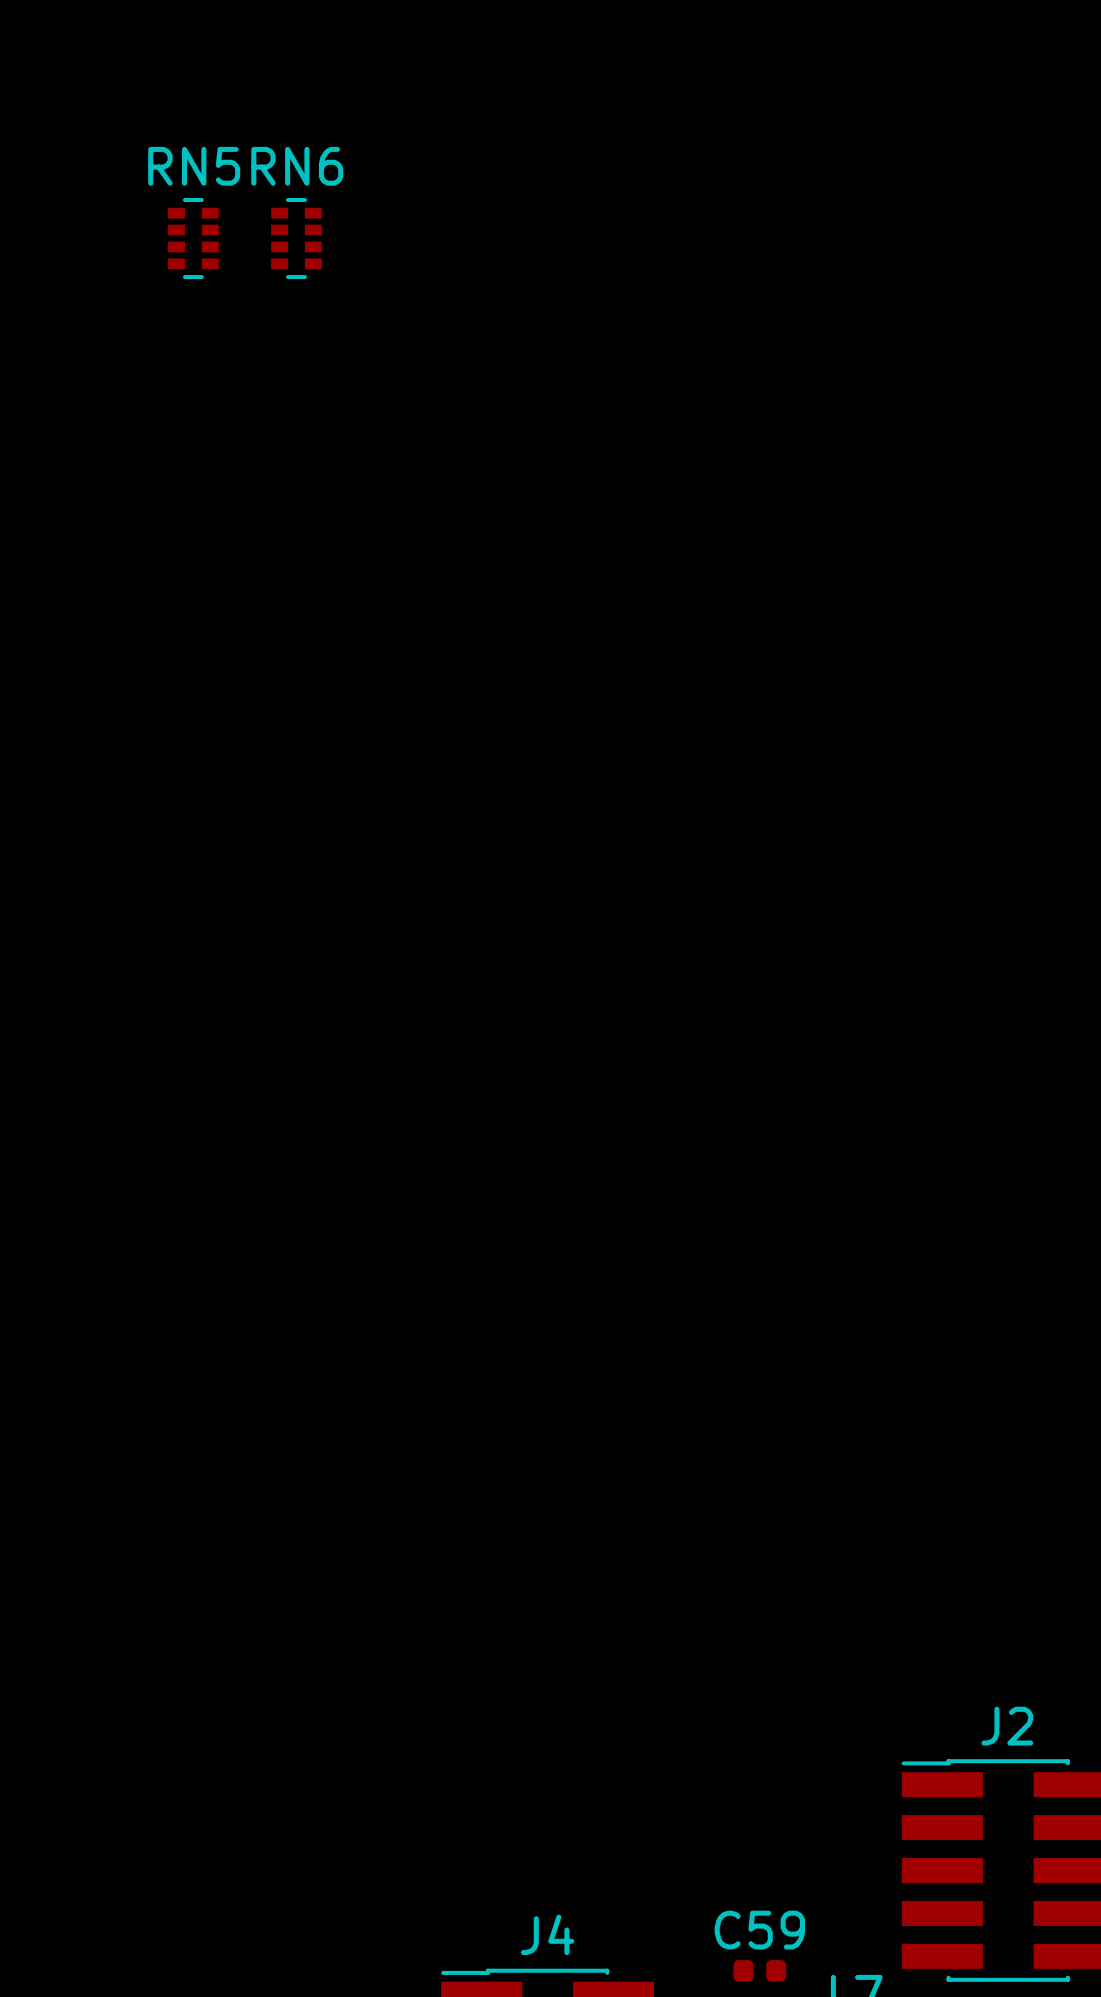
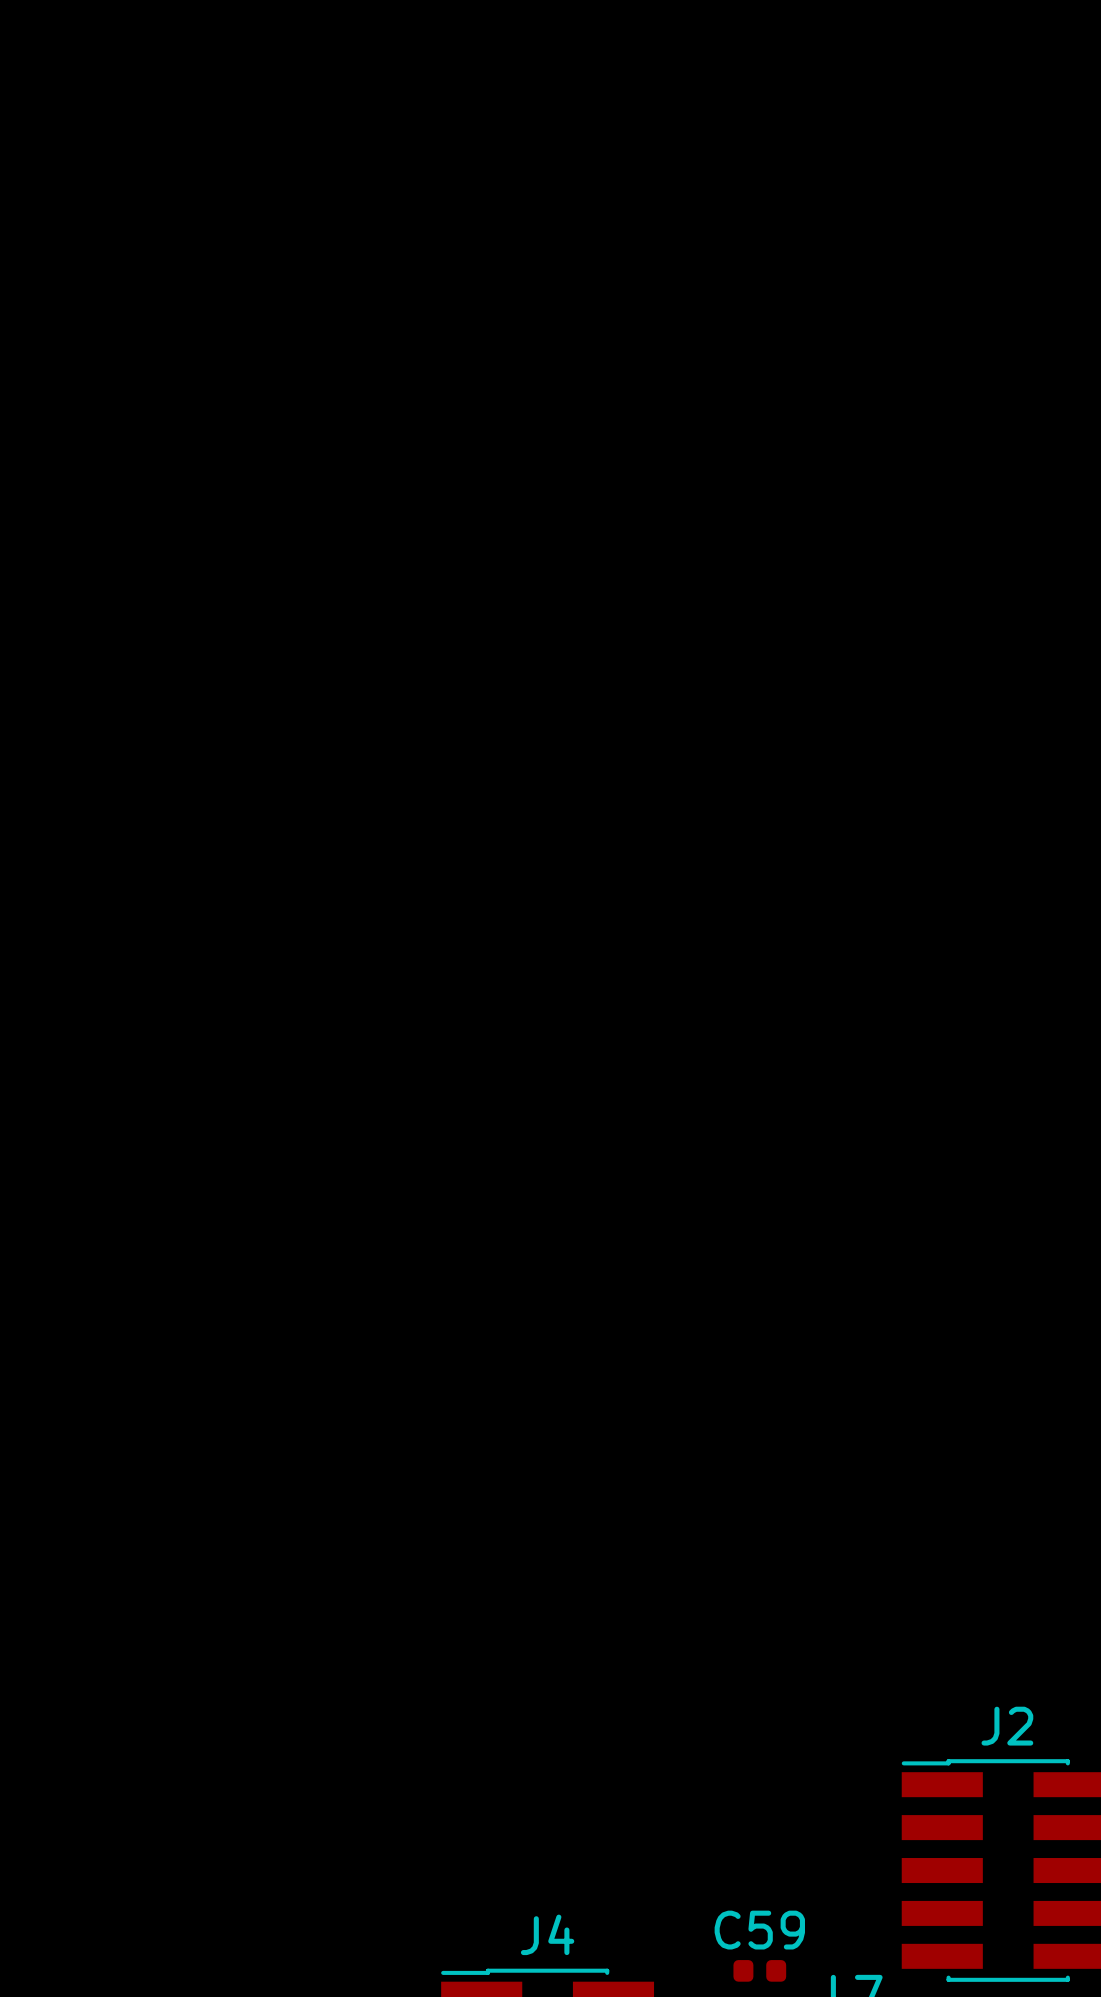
RN5: (193, 238) -> none
RN6: (296, 238) -> none

